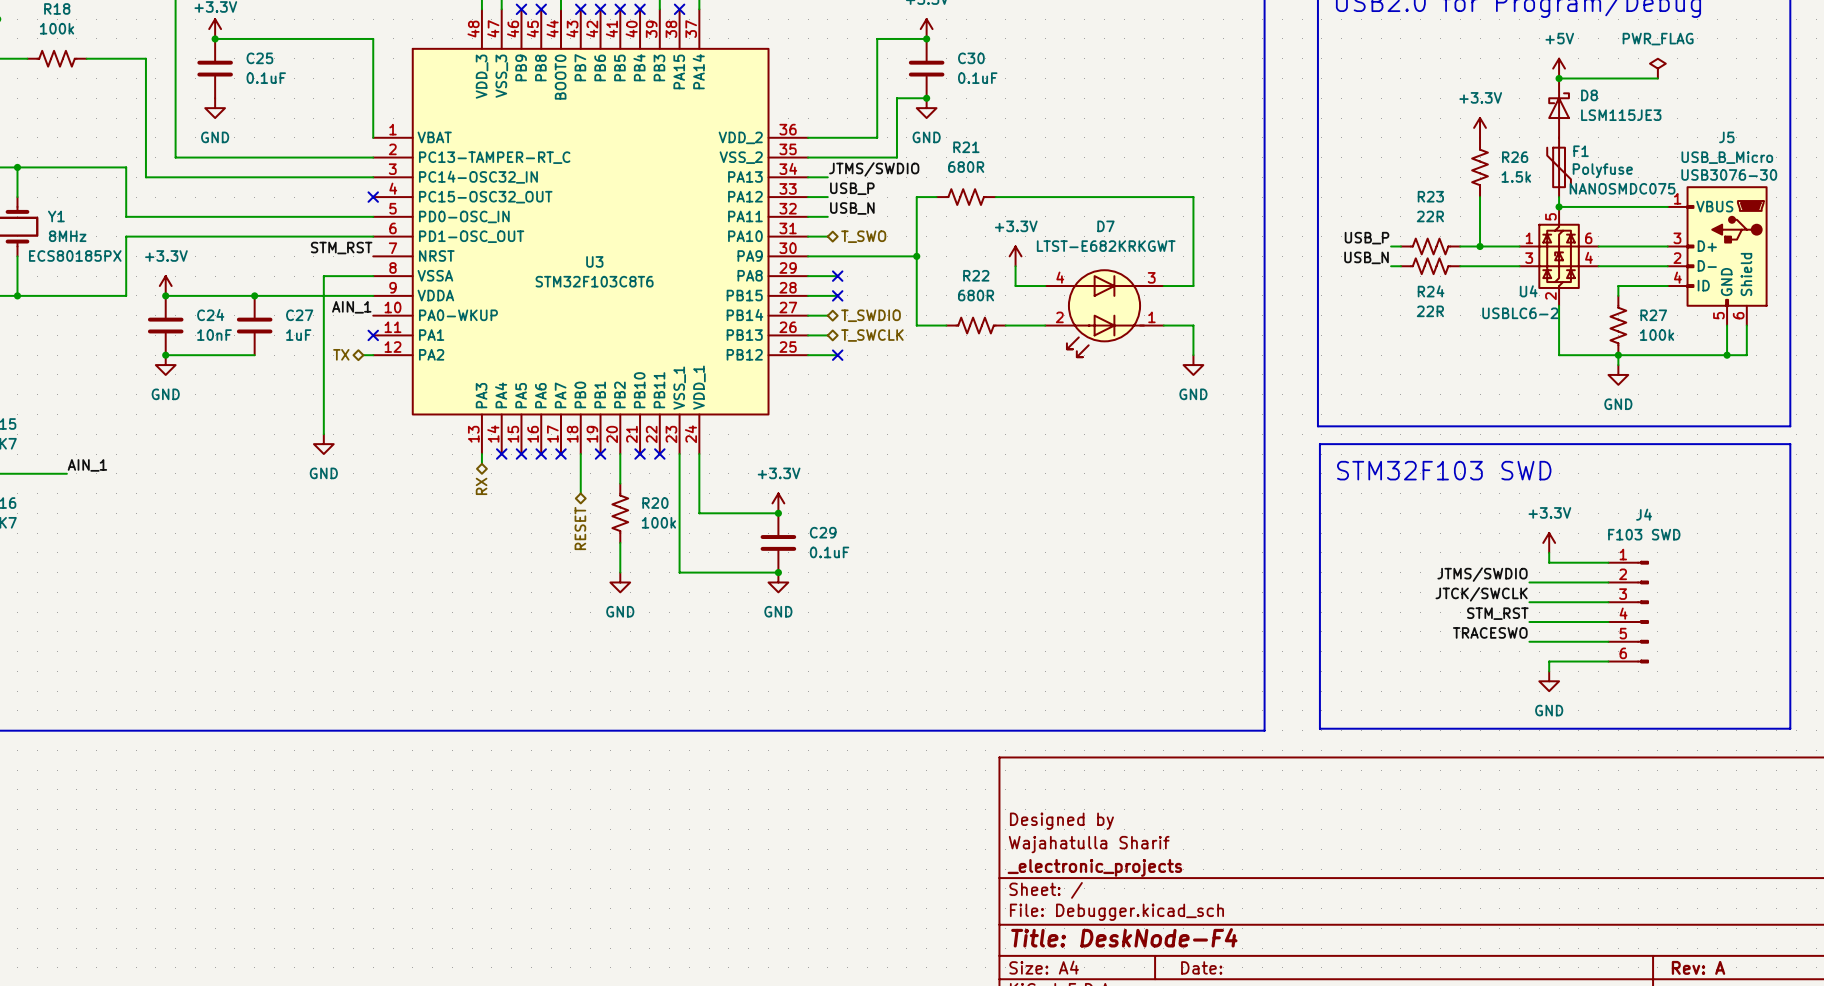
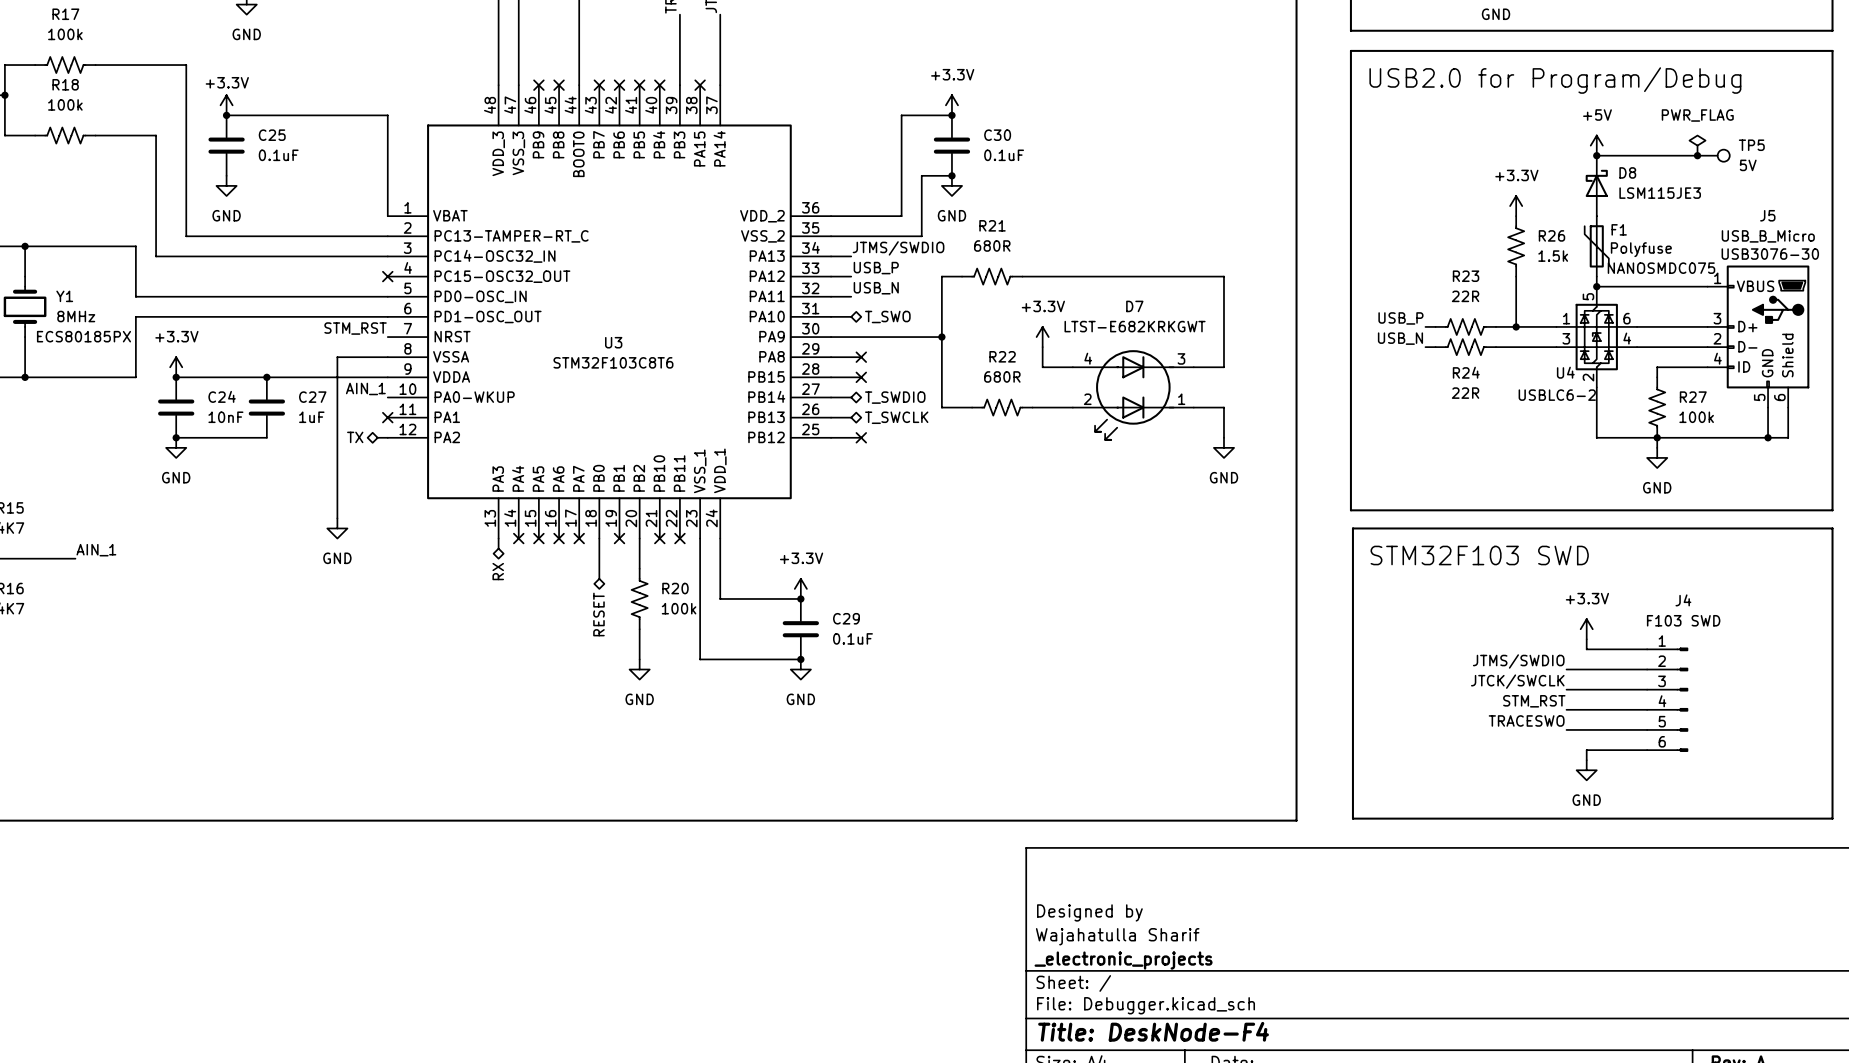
junction: none -> (1697, 155)
TP5: none -> 5V (1713, 155)

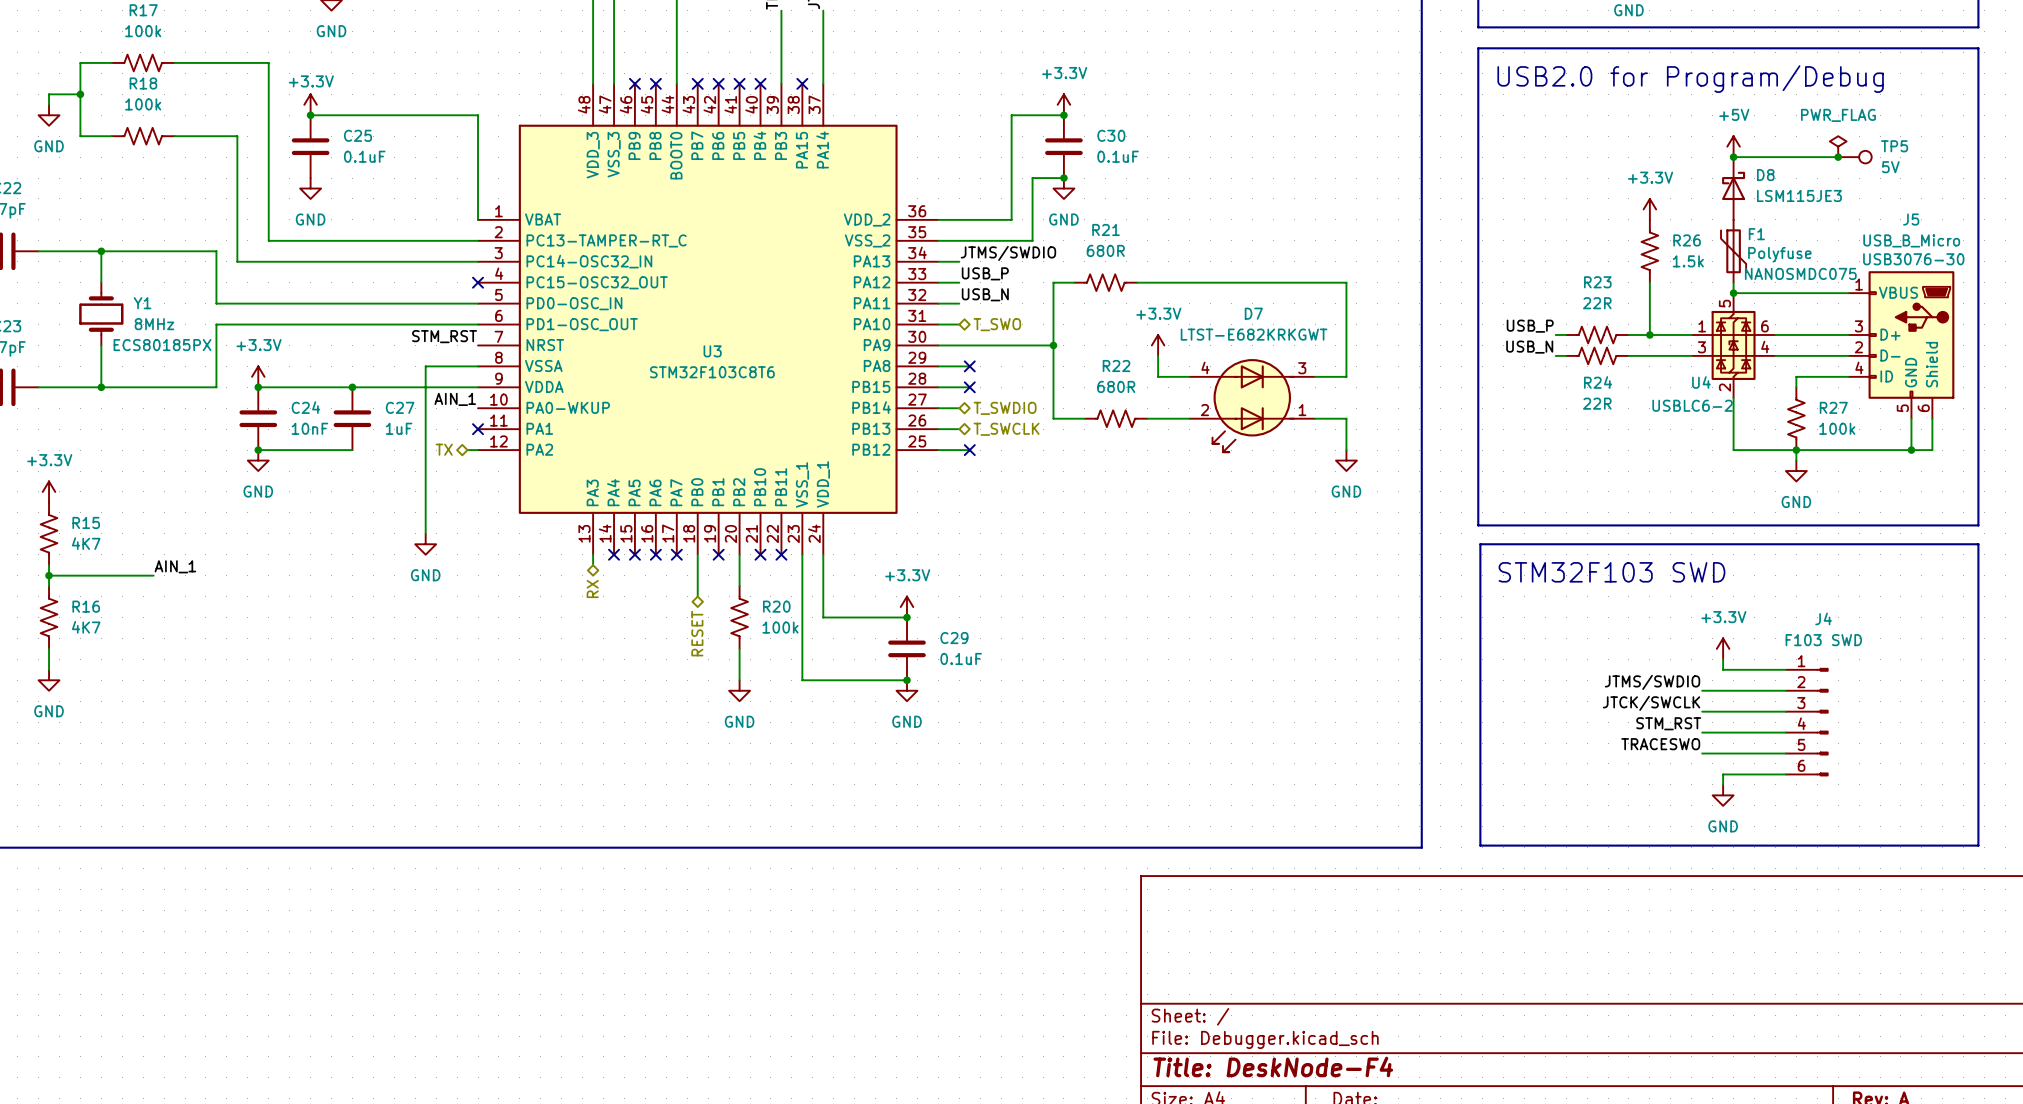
title block: Designed by (1089, 912) -> none
title block: Wajahatulla Sharif (1117, 936) -> none
title block: _electronic_projects (1123, 960) -> none

